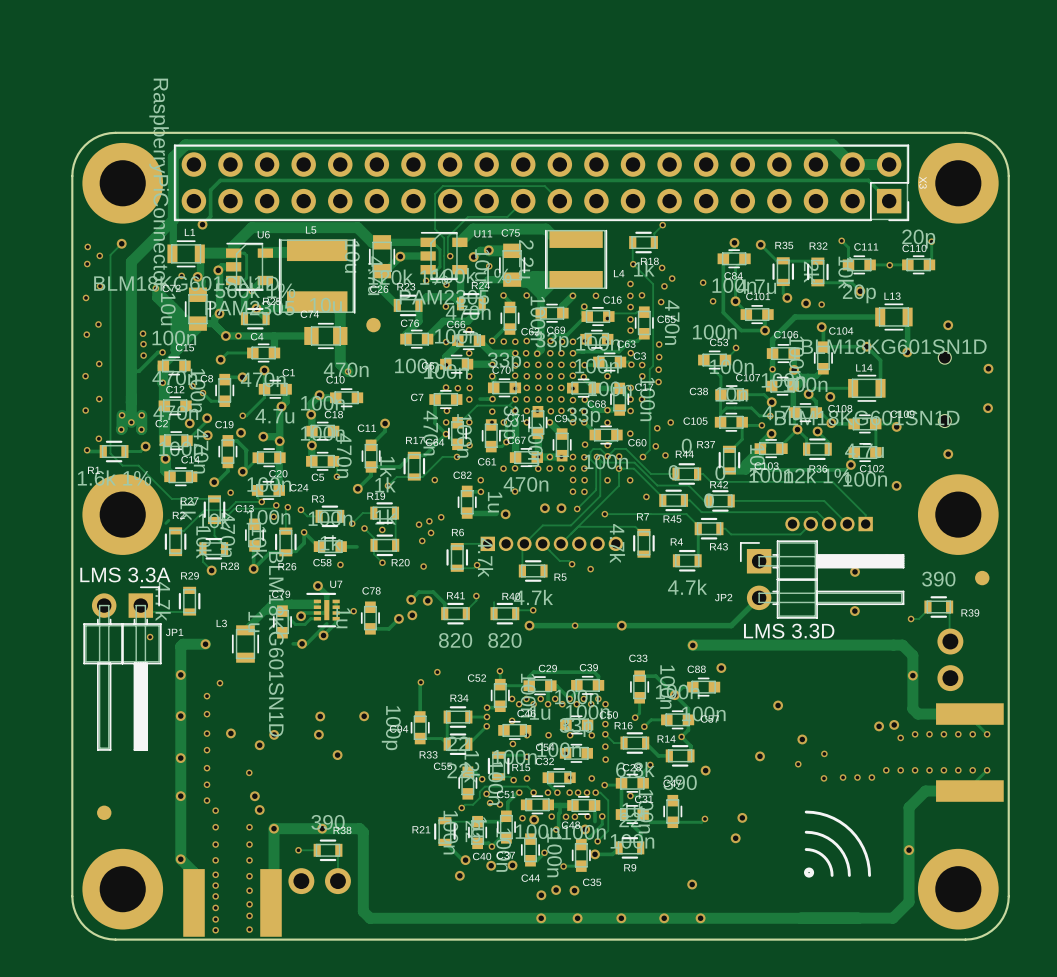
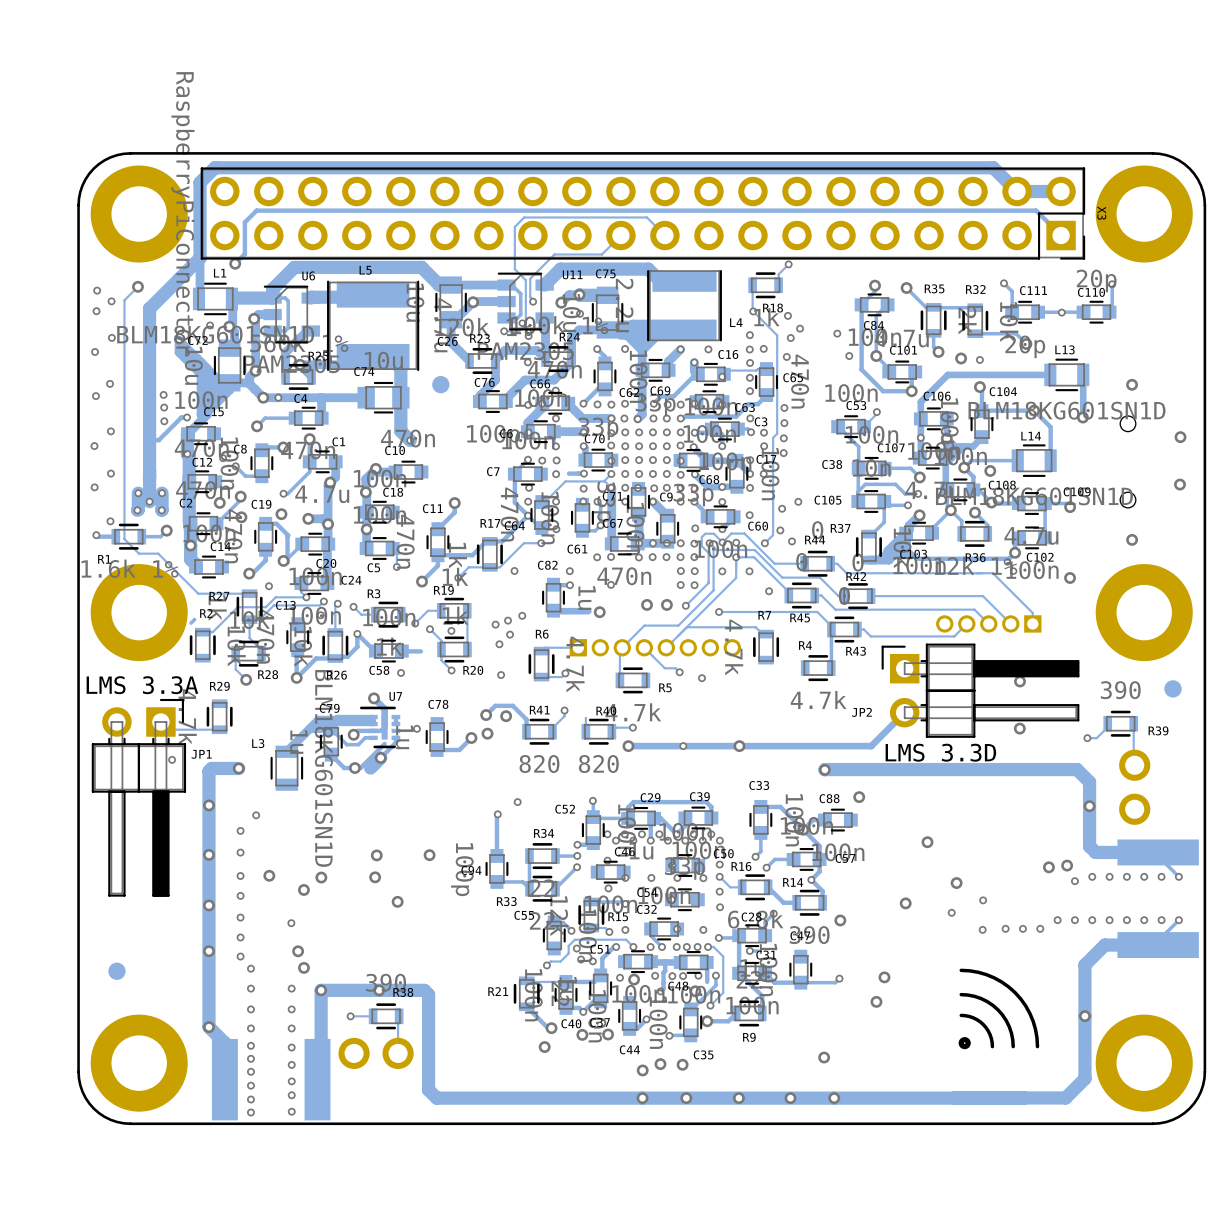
track: none -> (331, 755) (344, 768)
track: none -> (380, 757) (370, 768)

